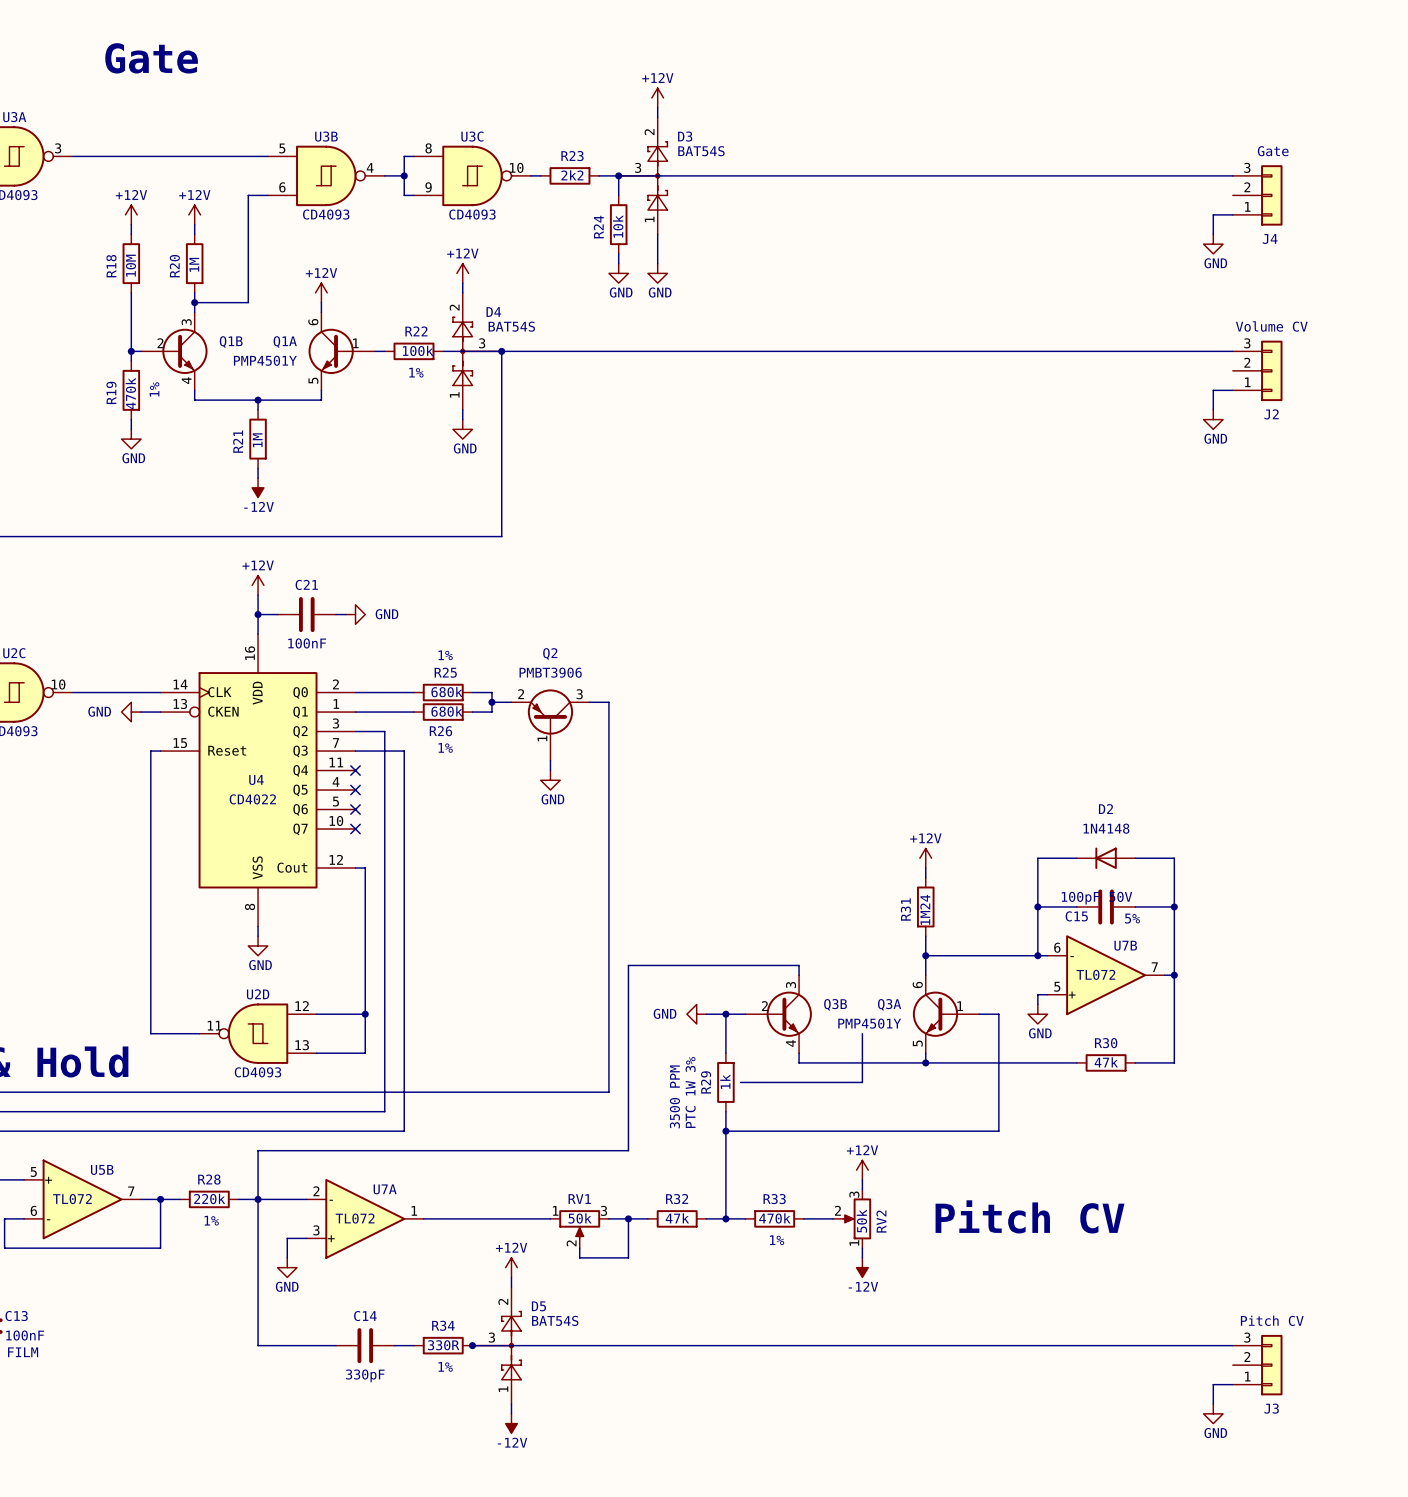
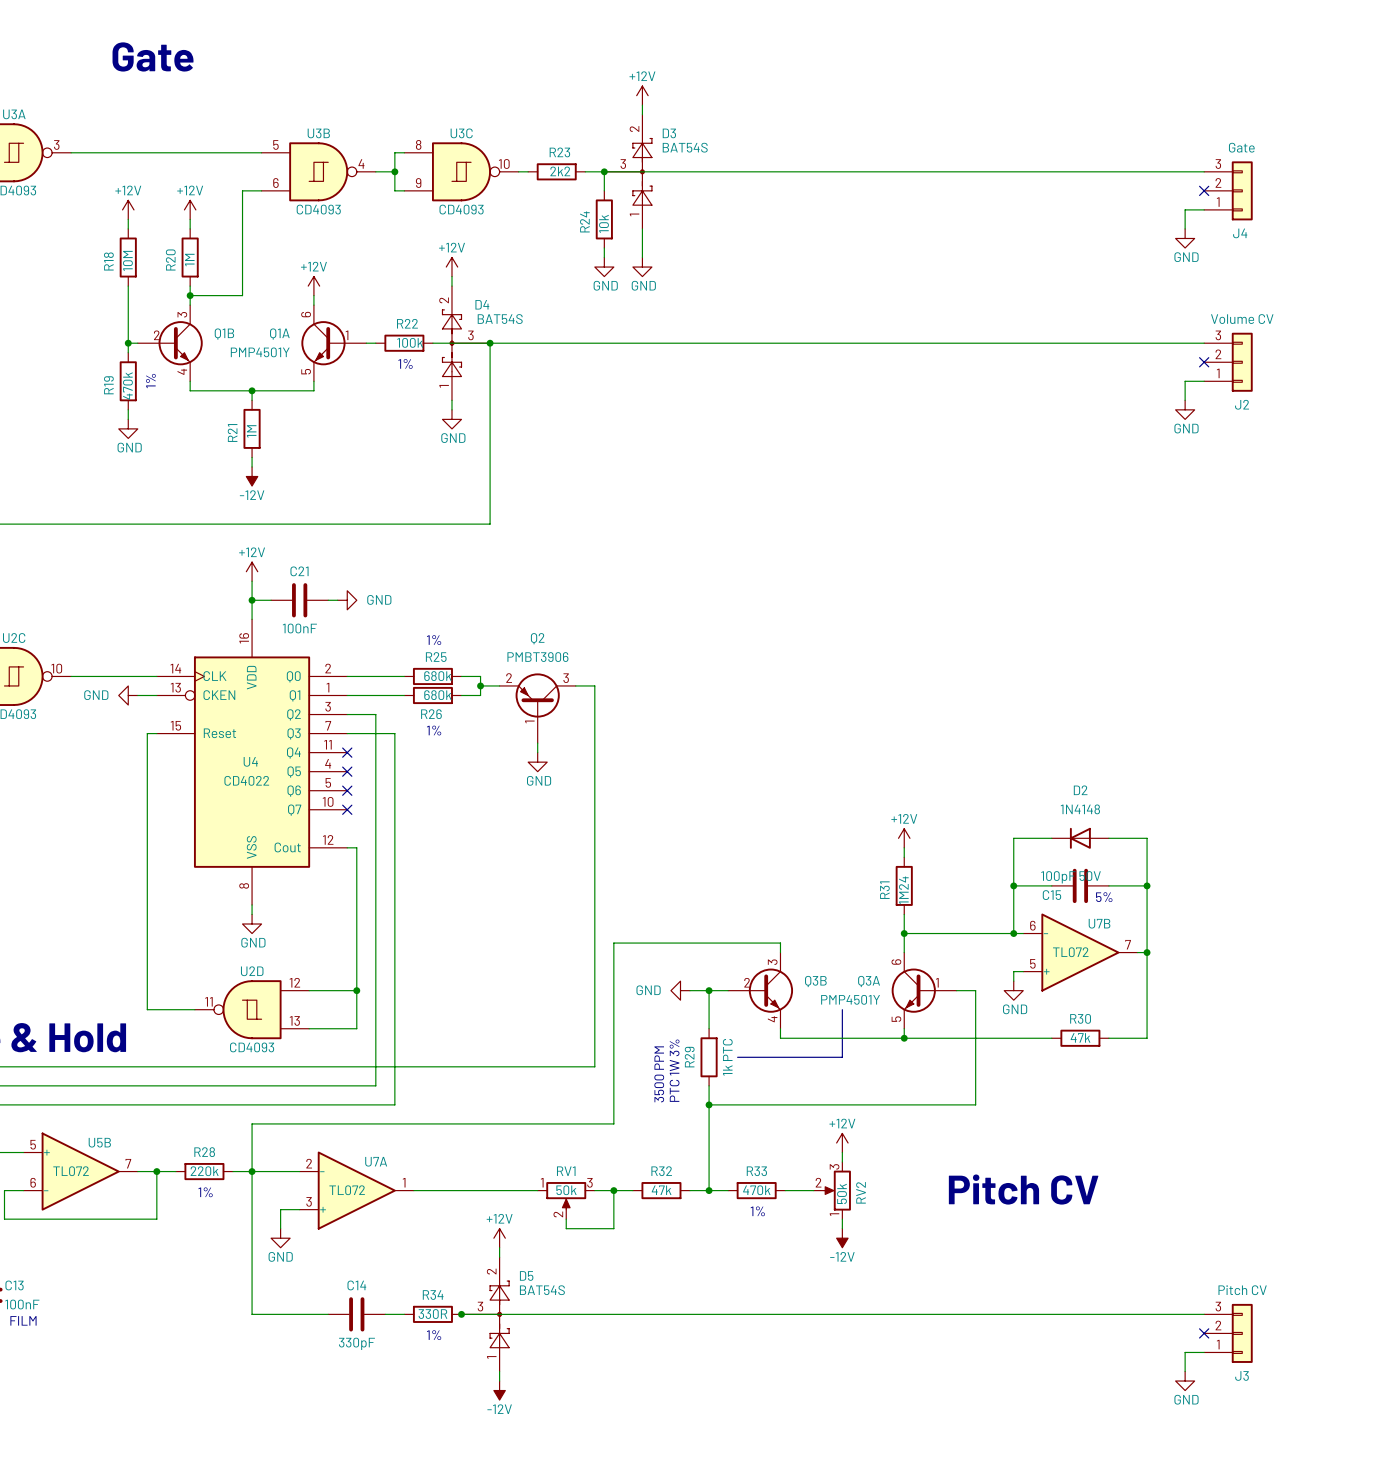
no-connect mark: none -> (1204, 190)
no-connect mark: none -> (1204, 362)
R29 value: 1k (725, 1081) -> 1k PTC (727, 1057)
line: (740, 1082) (755, 1082) -> none
no-connect mark: none -> (1204, 1333)

